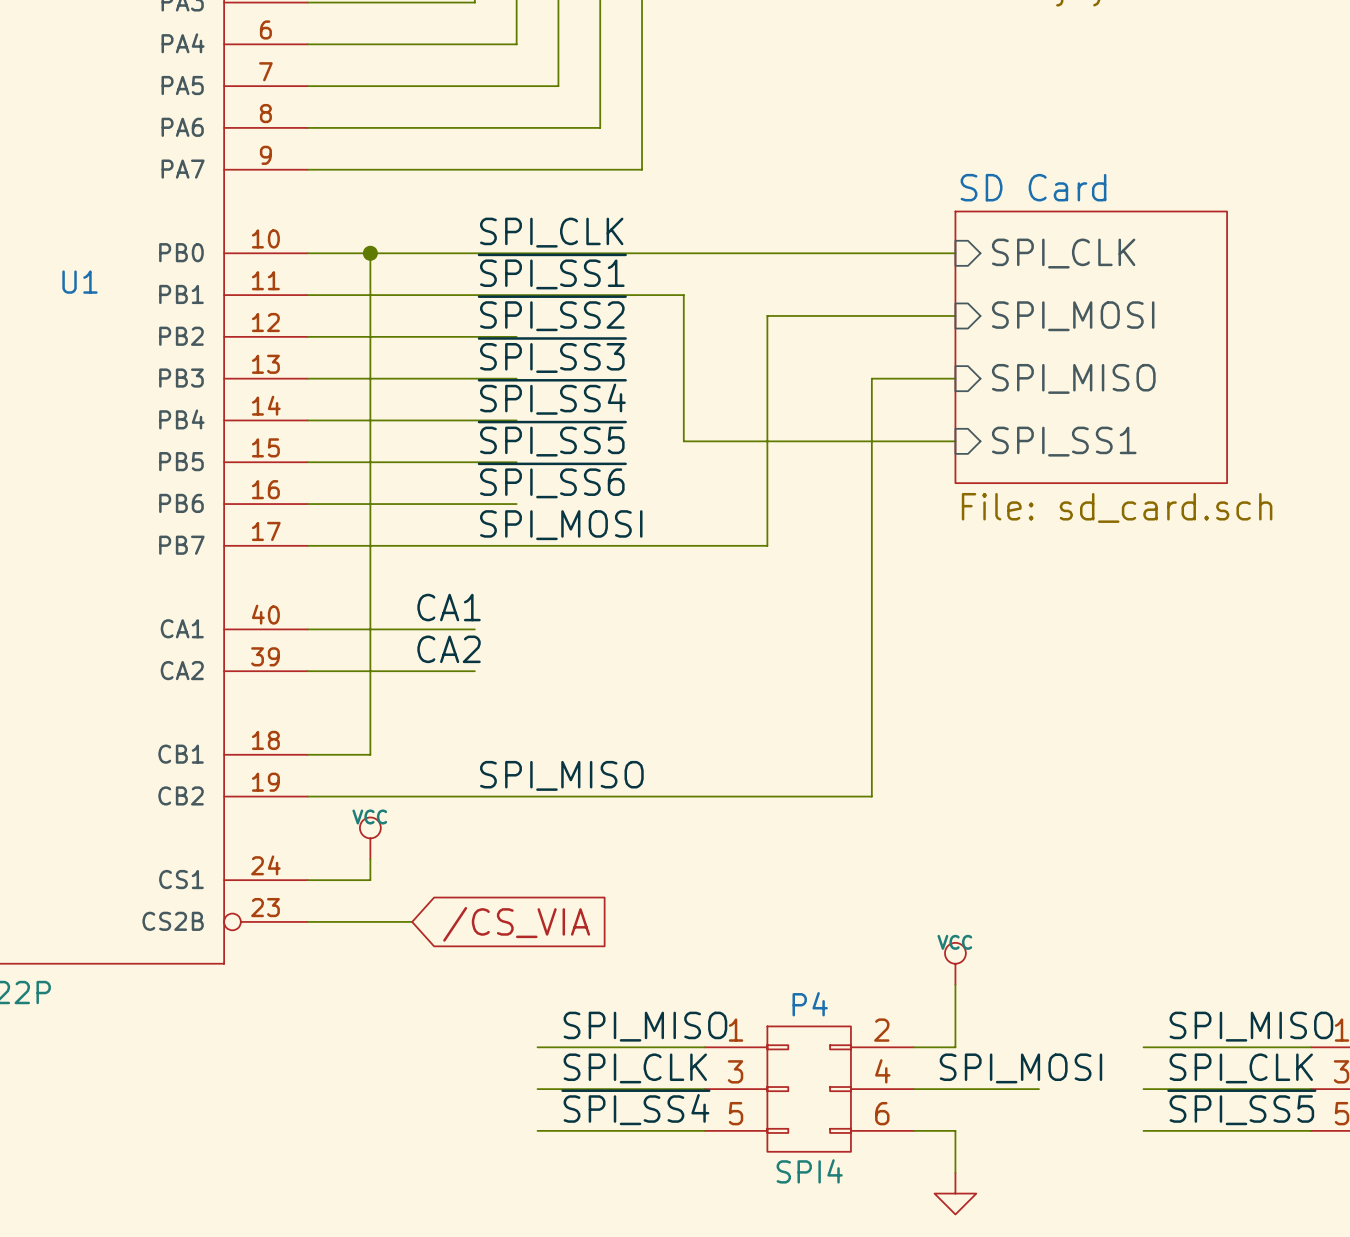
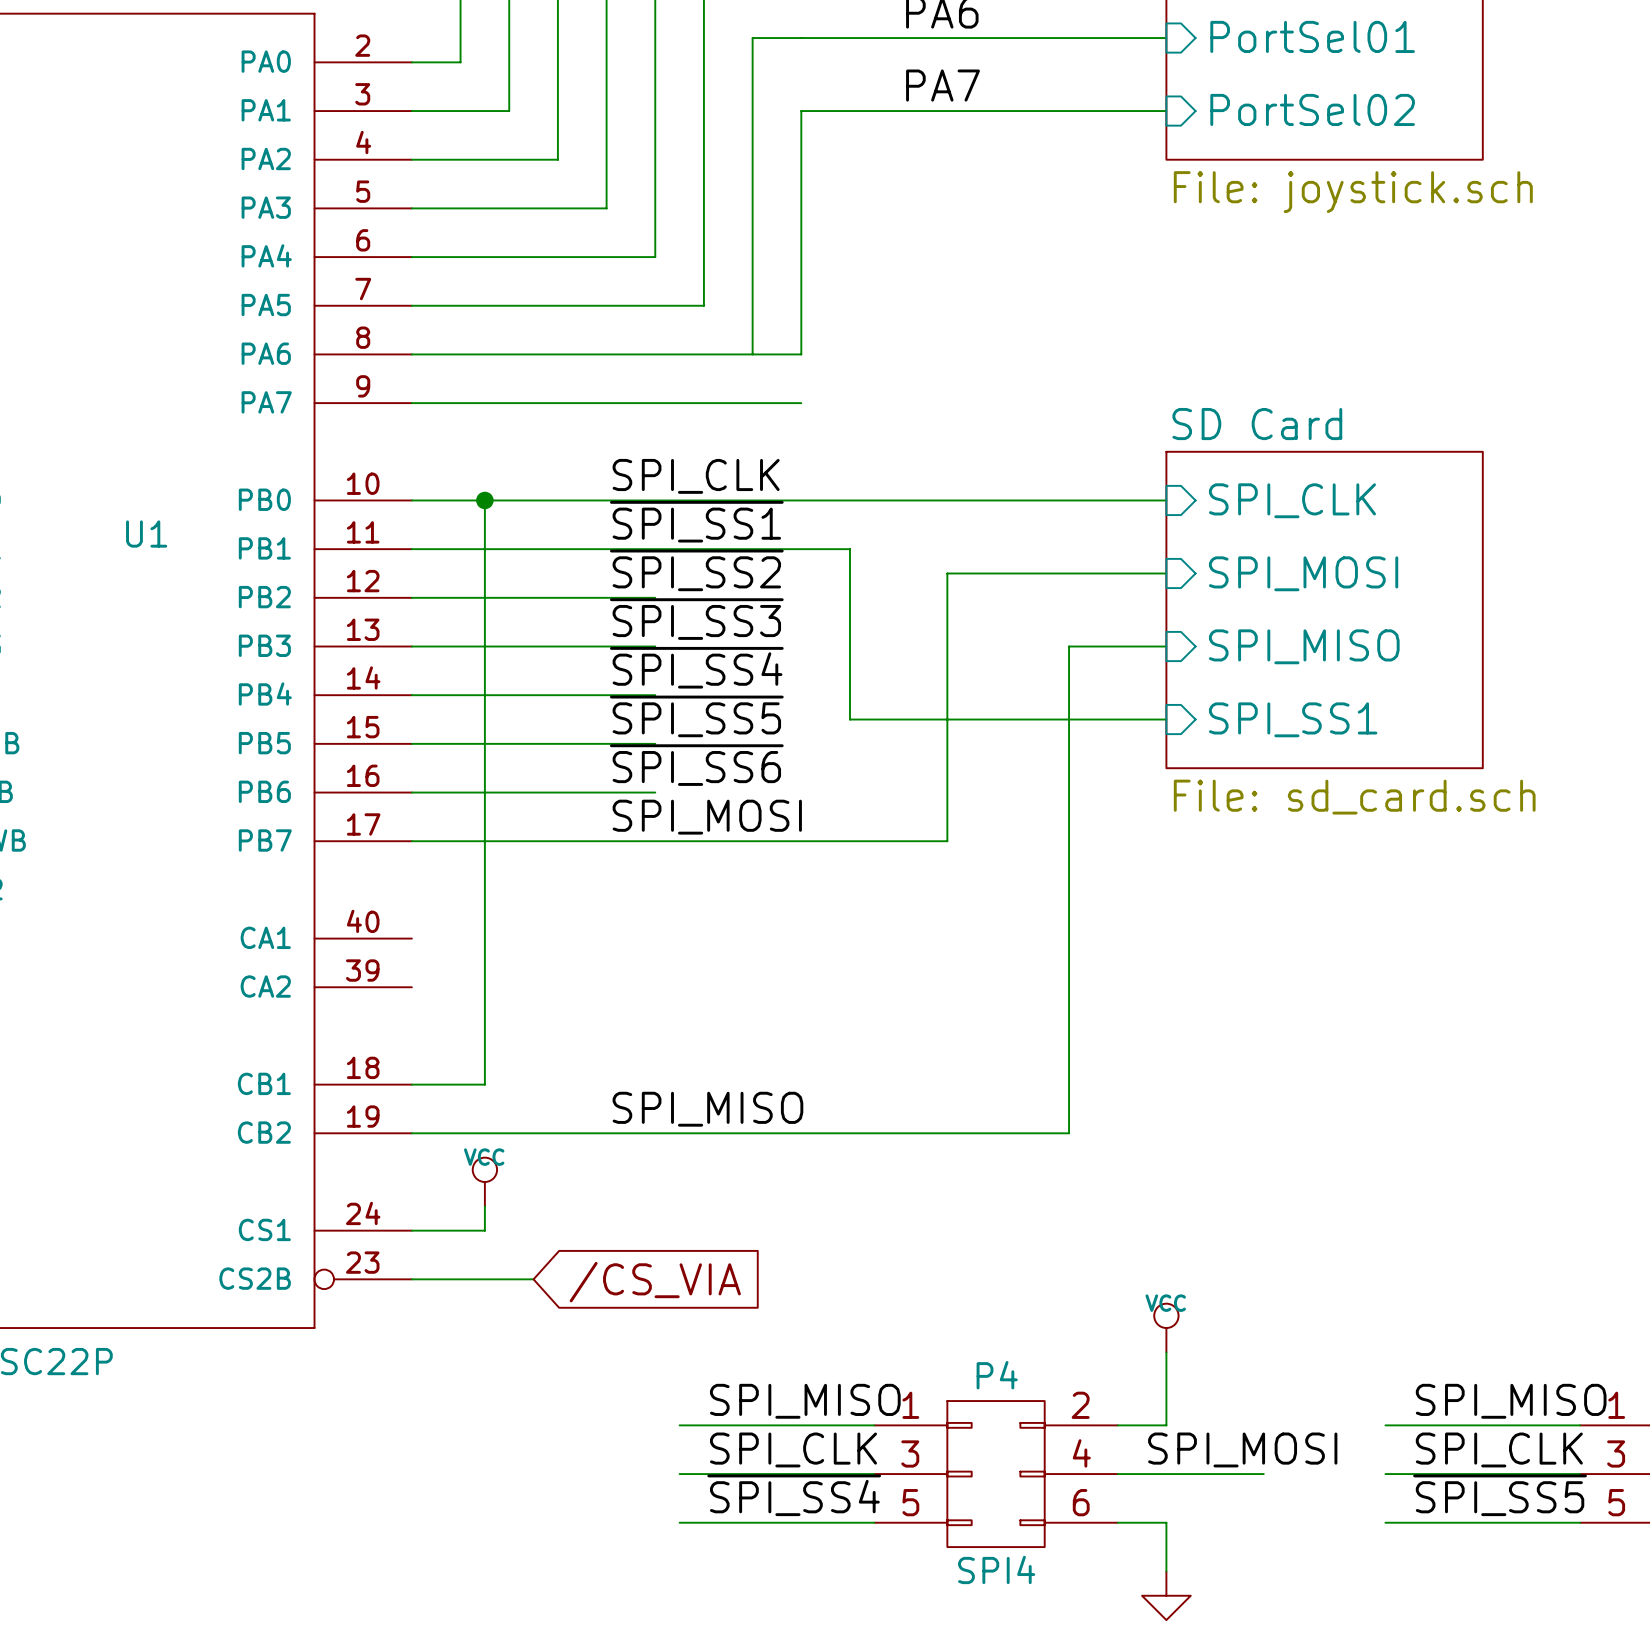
wire: (642, 127) (642, 169) -> (801, 354) (752, 354)
label: CA1 (449, 607) -> none
wire: (307, 629) (474, 629) -> none
label: CA2 (449, 649) -> none
wire: (307, 671) (474, 671) -> none

